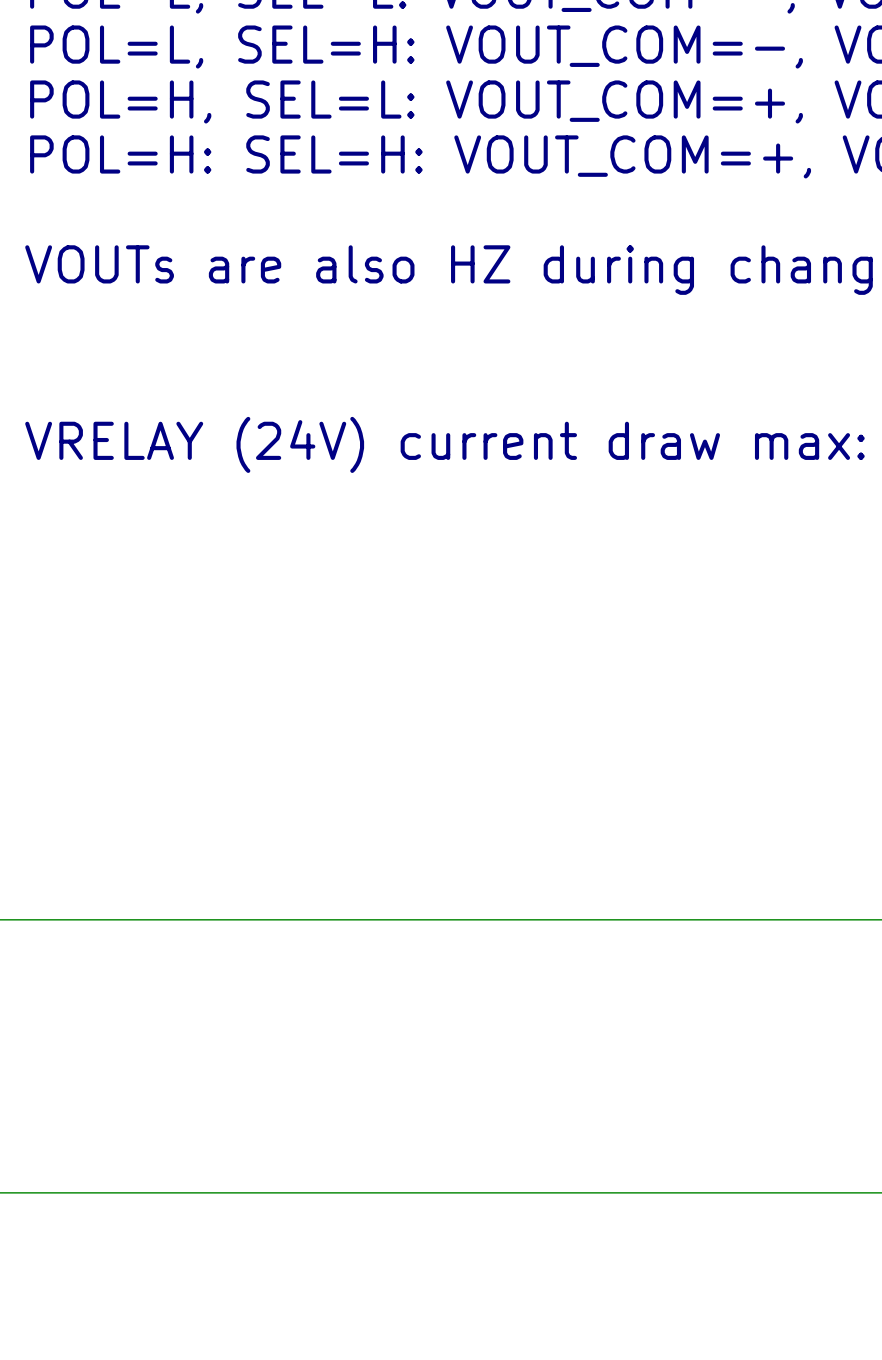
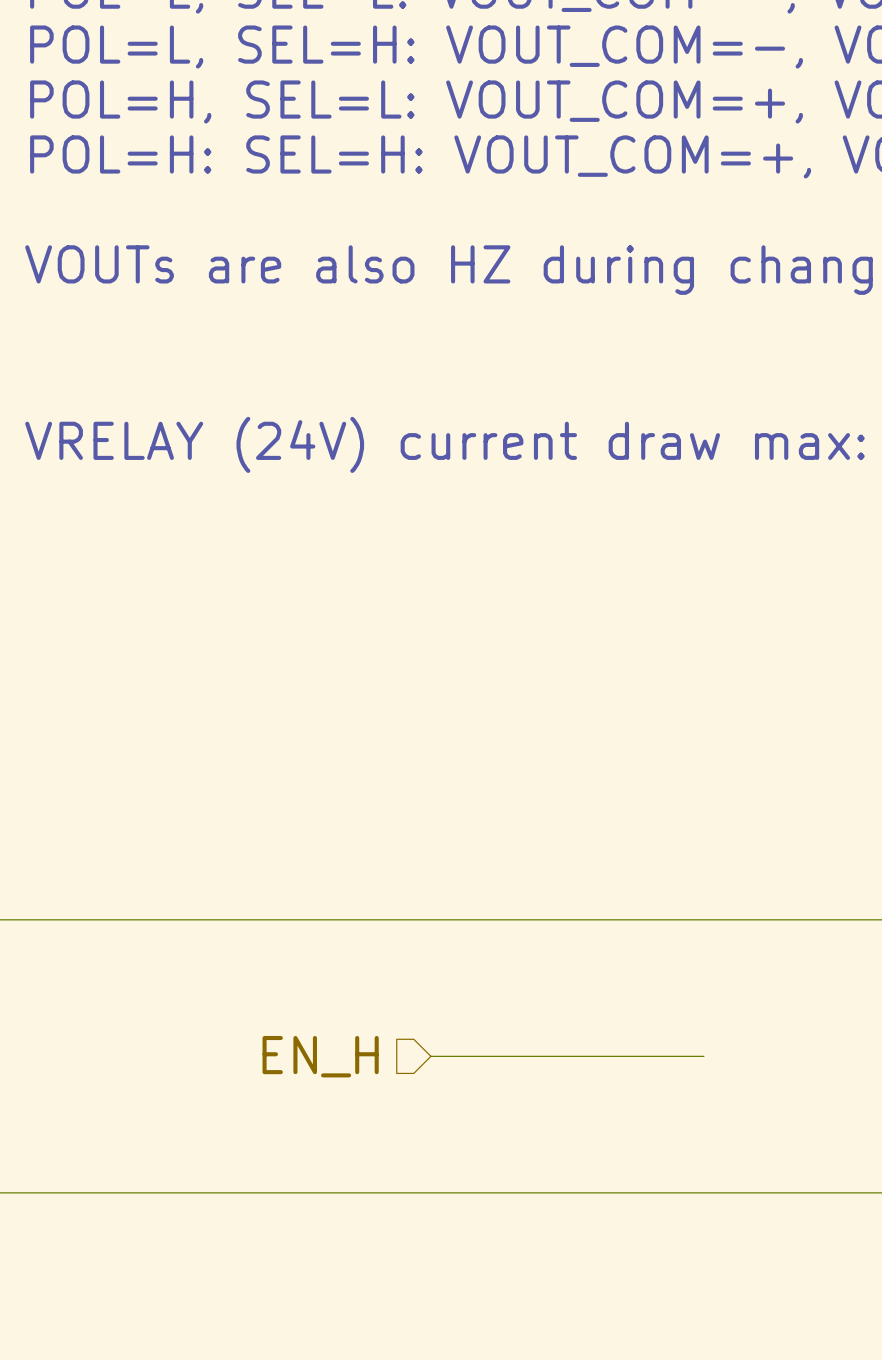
hierarchical label: none -> EN_H (320, 1056)
wire: none -> (430, 1056) (703, 1056)

